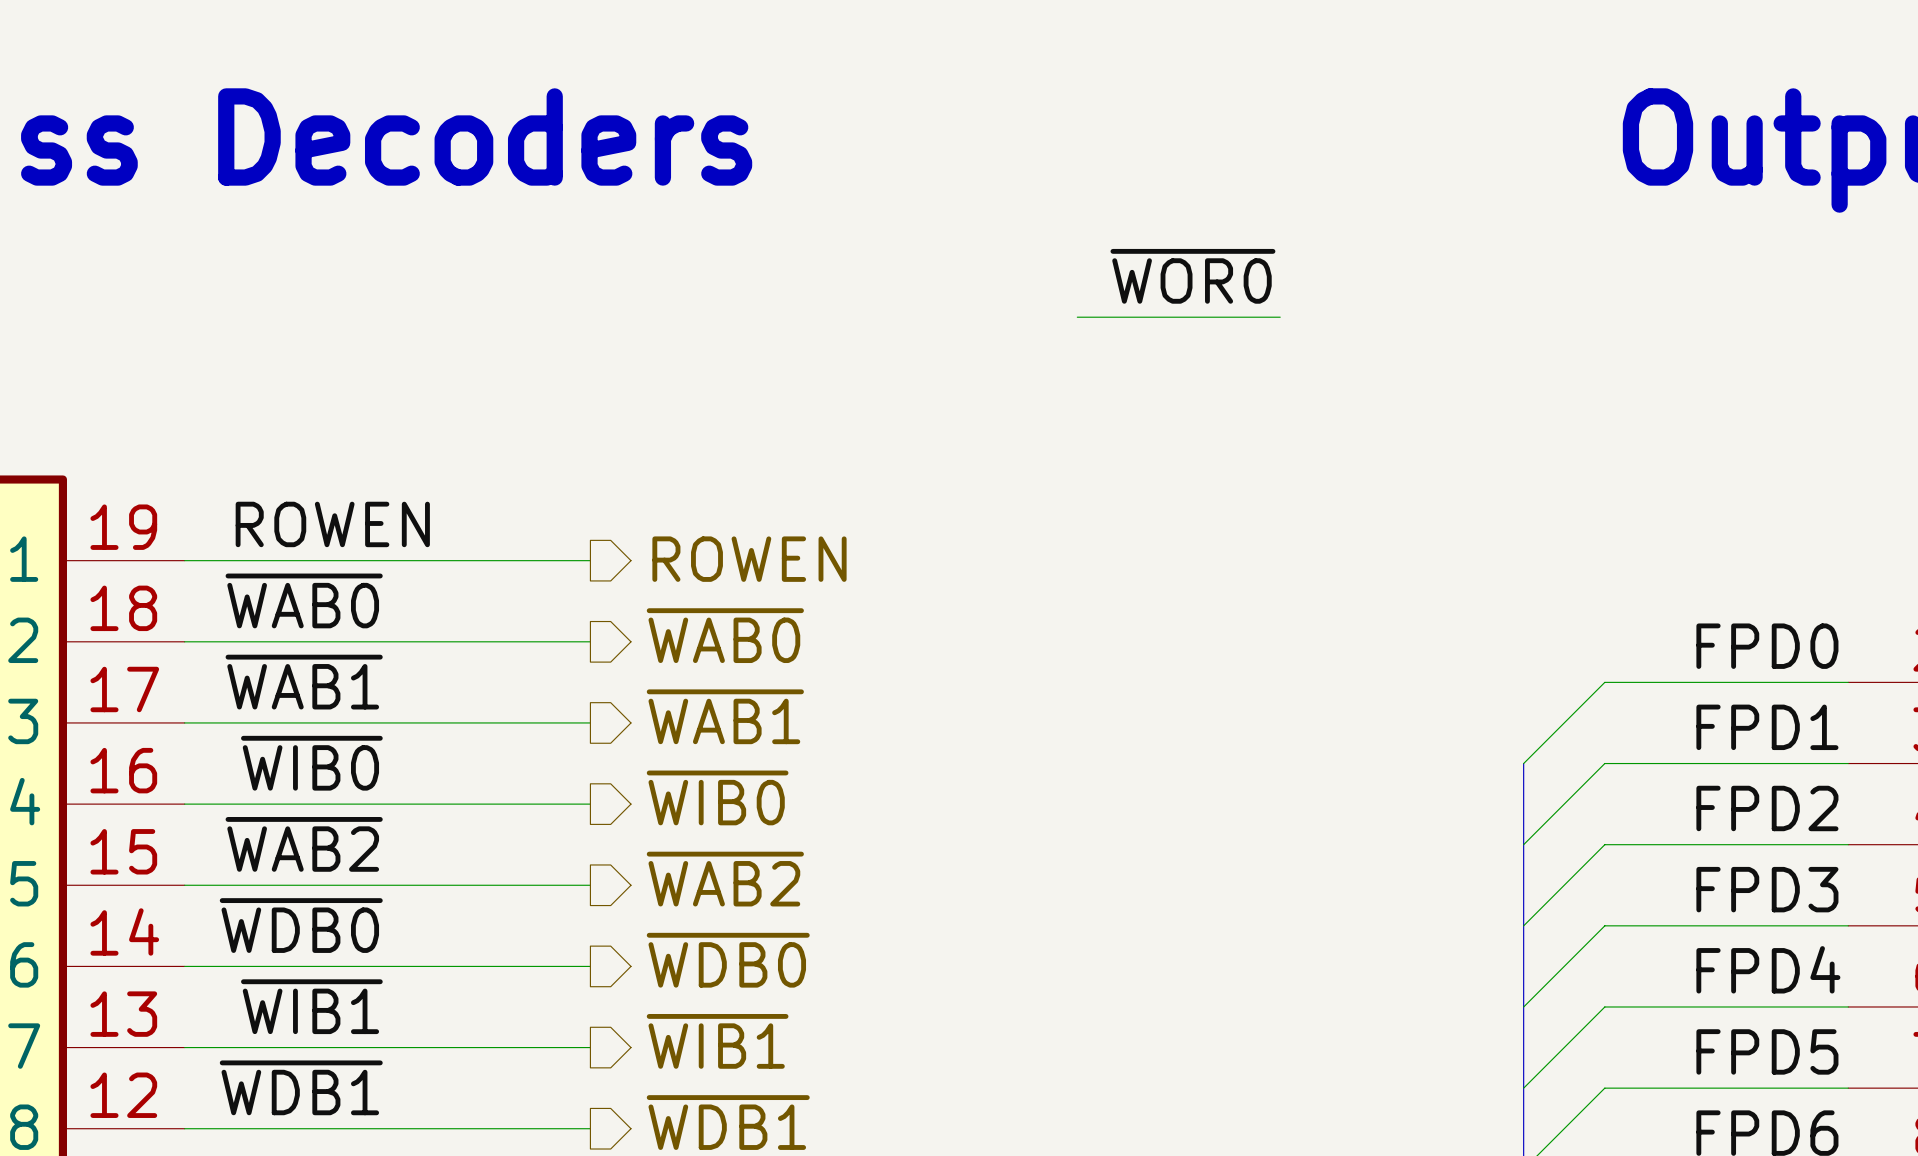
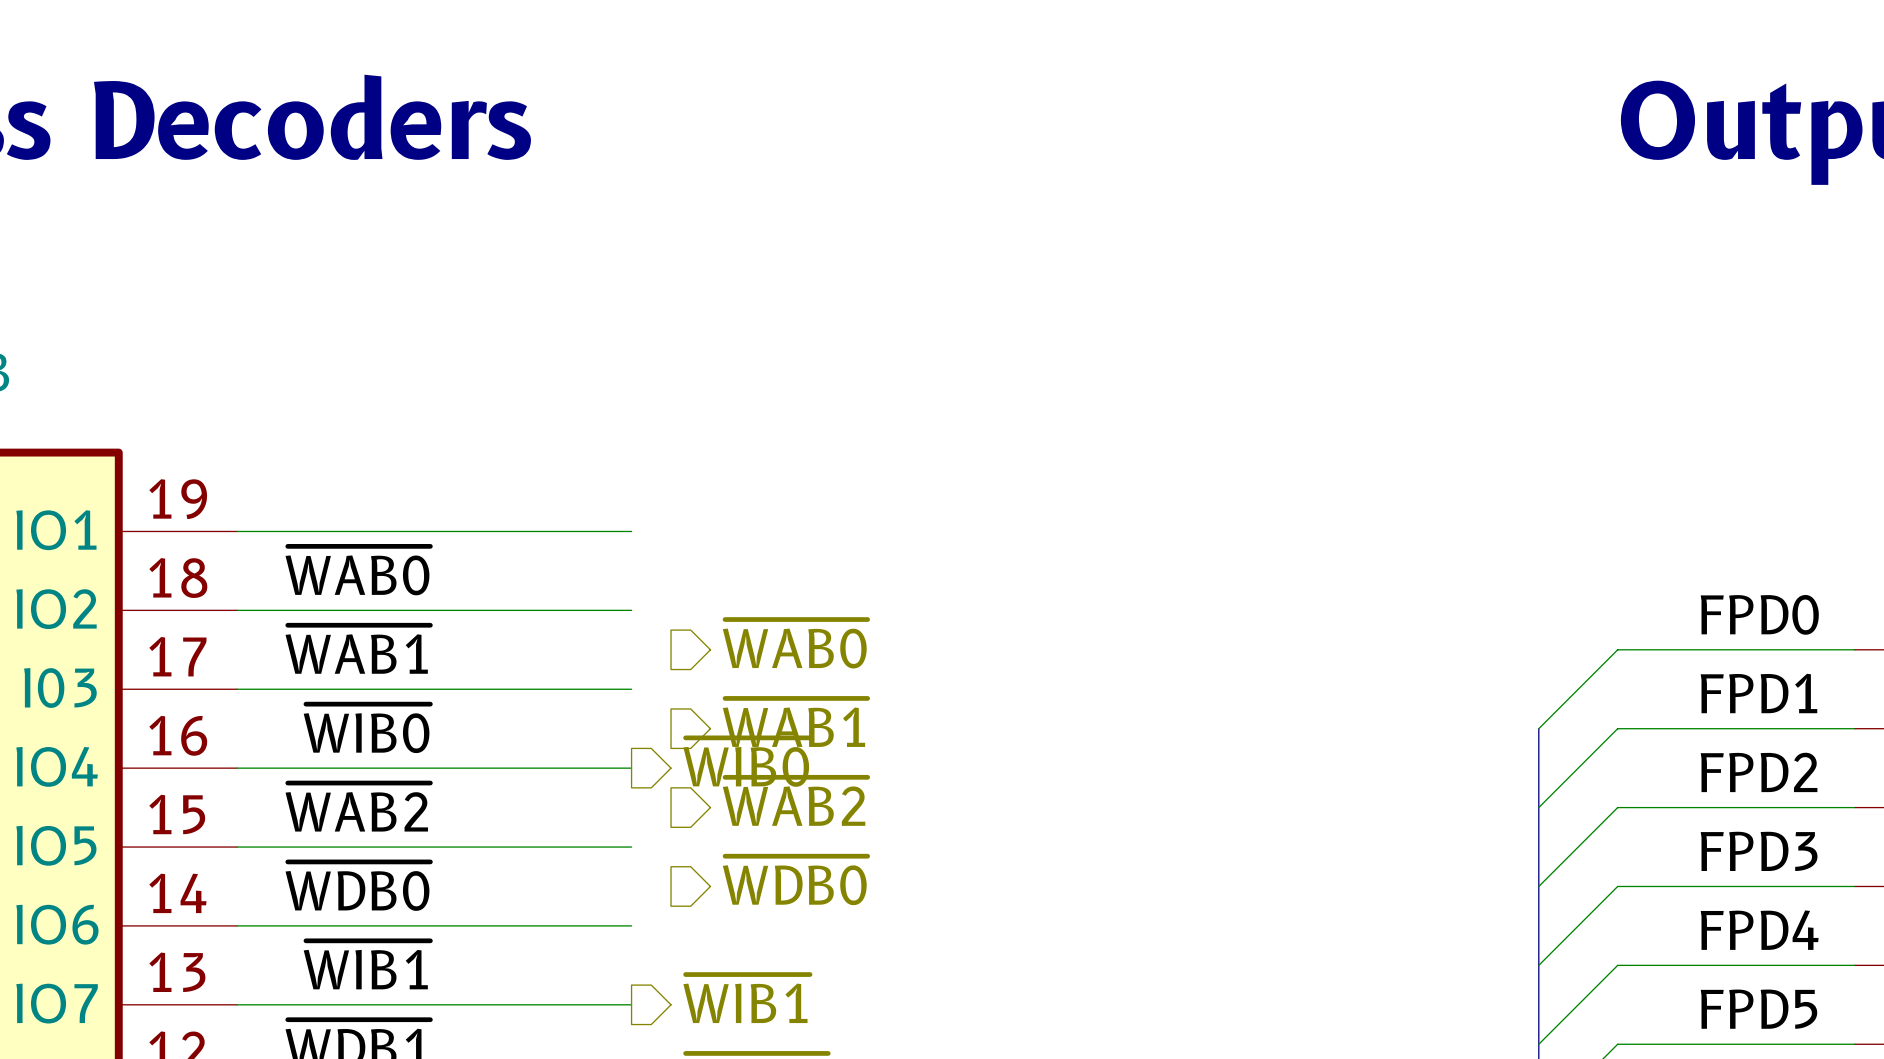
label: ~{WOR0} (1192, 276) -> none
wire: (1077, 317) (1280, 317) -> none
label: ROWEN (332, 524) -> none
hierarchical label: ROWEN (749, 559) -> none
hierarchical label position: ~{WAB0} (725, 635) -> ~{WAB0} (795, 644)
hierarchical label position: ~{WAB1} (725, 716) -> ~{WAB1} (795, 722)
hierarchical label position: ~{WAB2} (725, 879) -> ~{WAB2} (795, 801)
hierarchical label position: ~{WDB0} (728, 960) -> ~{WDB0} (795, 880)

